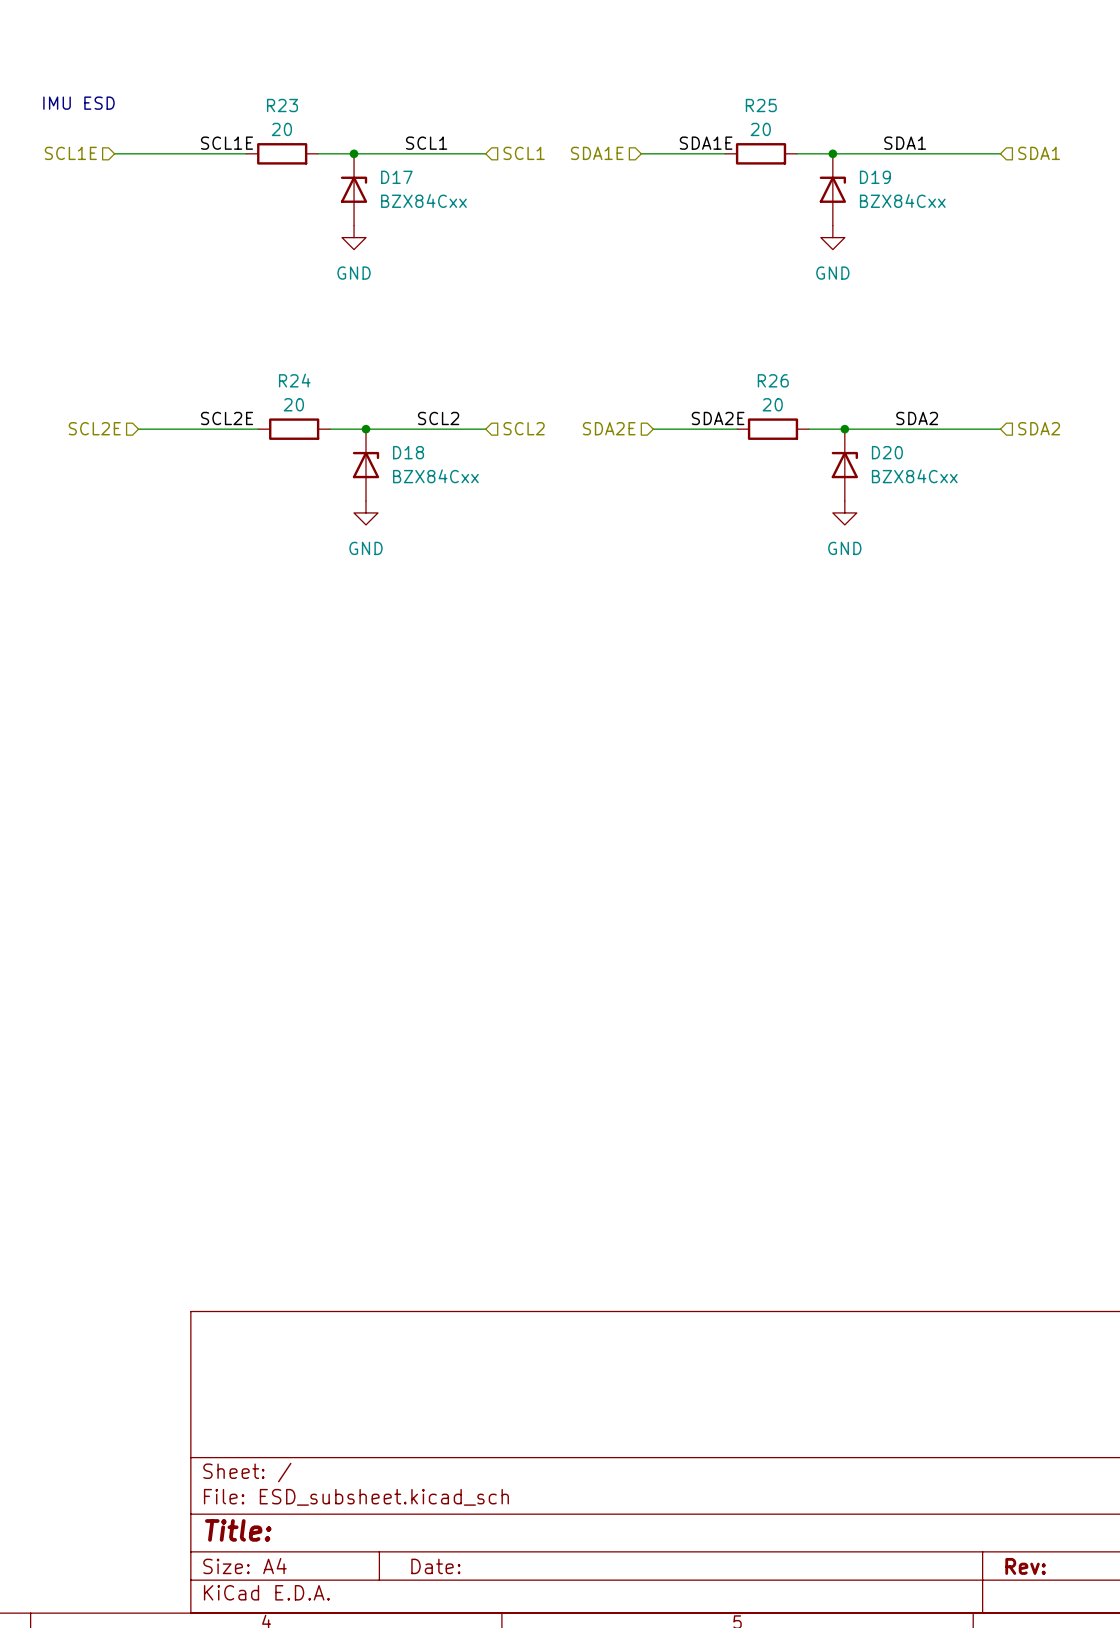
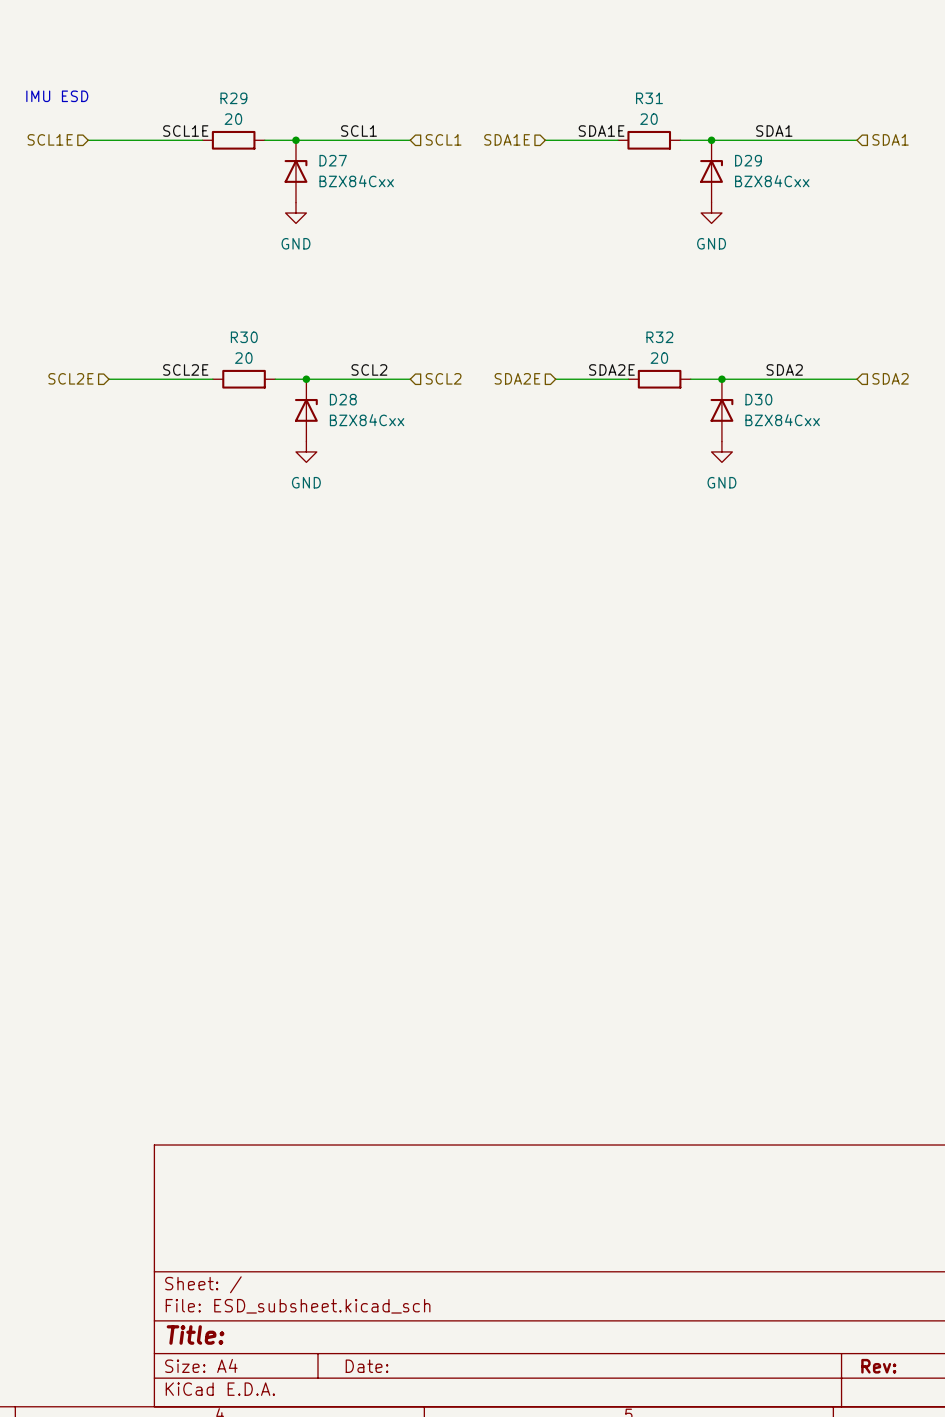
R23 name: R23 (282, 105) -> R29 (233, 98)
R25 name: R25 (761, 105) -> R31 (649, 98)
D17 name: D17 (396, 177) -> D27 (333, 160)
D19 name: D19 (875, 177) -> D29 (748, 160)
R24 name: R24 (294, 380) -> R30 (244, 337)
R26 name: R26 (773, 380) -> R32 (659, 337)
D18 name: D18 (408, 452) -> D28 (343, 399)
D20 name: D20 (887, 452) -> D30 (758, 399)

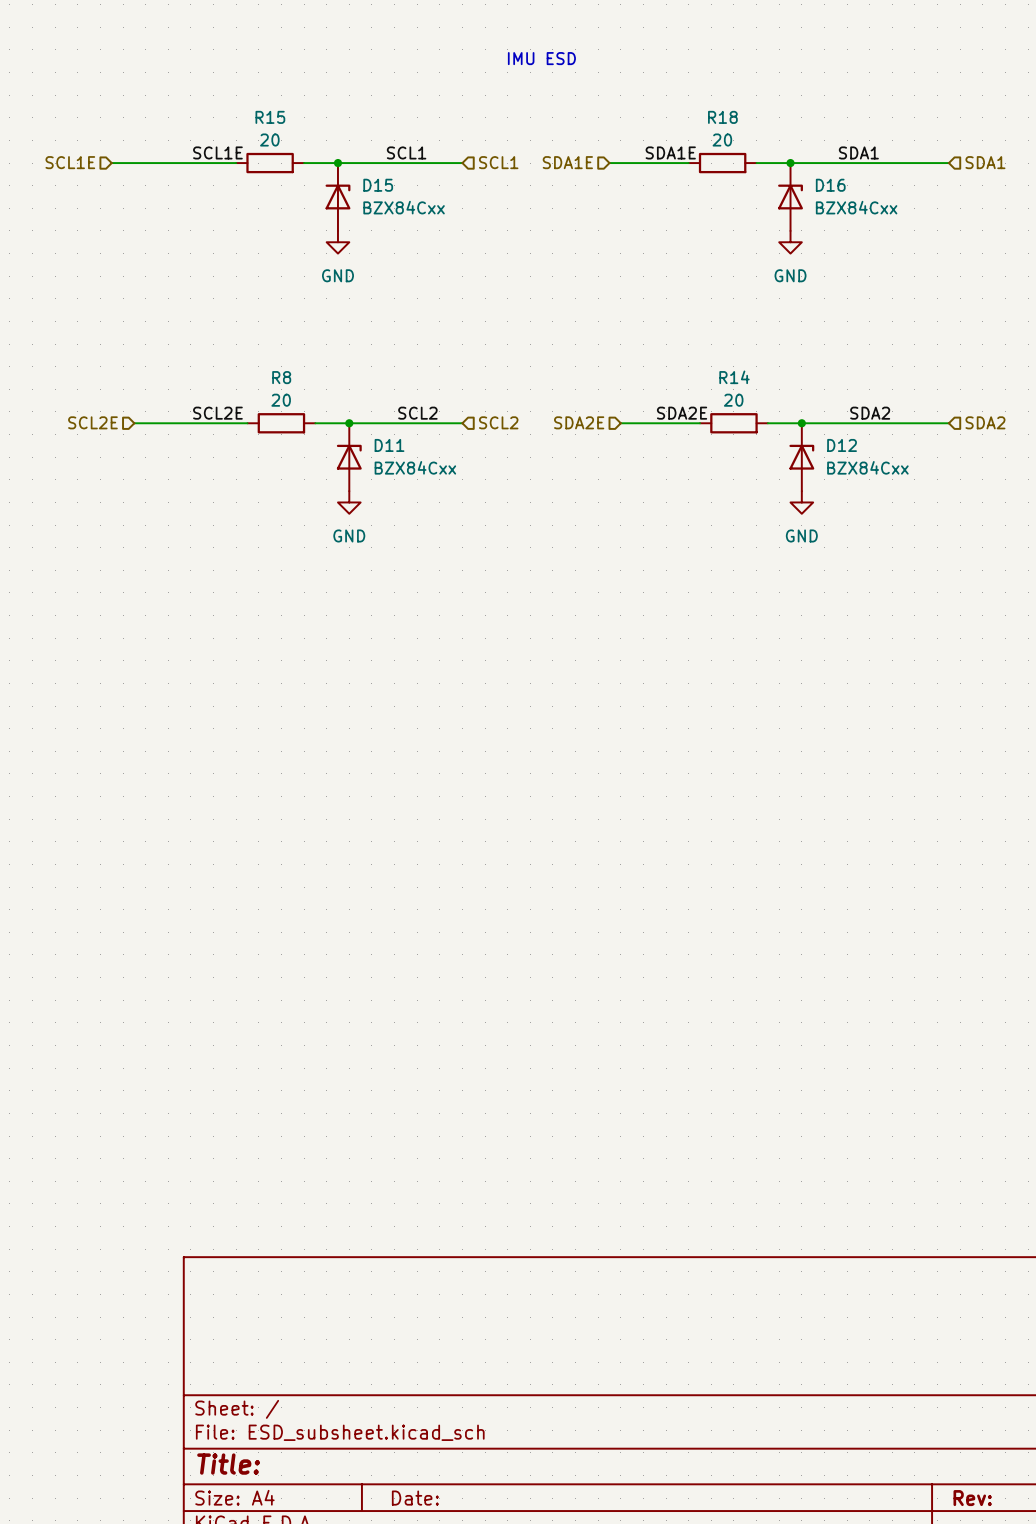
text: none -> IMU ESD (541, 58)
text: IMU ESD (57, 96) -> none
R29 name: R29 (233, 98) -> R15 (270, 117)
R31 name: R31 (649, 98) -> R18 (722, 117)
D27 name: D27 (333, 160) -> D15 (378, 185)
D29 name: D29 (748, 160) -> D16 (830, 185)
R30 name: R30 (244, 337) -> R8 (281, 377)
R32 name: R32 (659, 337) -> R14 (734, 377)
D28 name: D28 (343, 399) -> D11 (389, 445)
D30 name: D30 (758, 399) -> D12 (842, 445)

